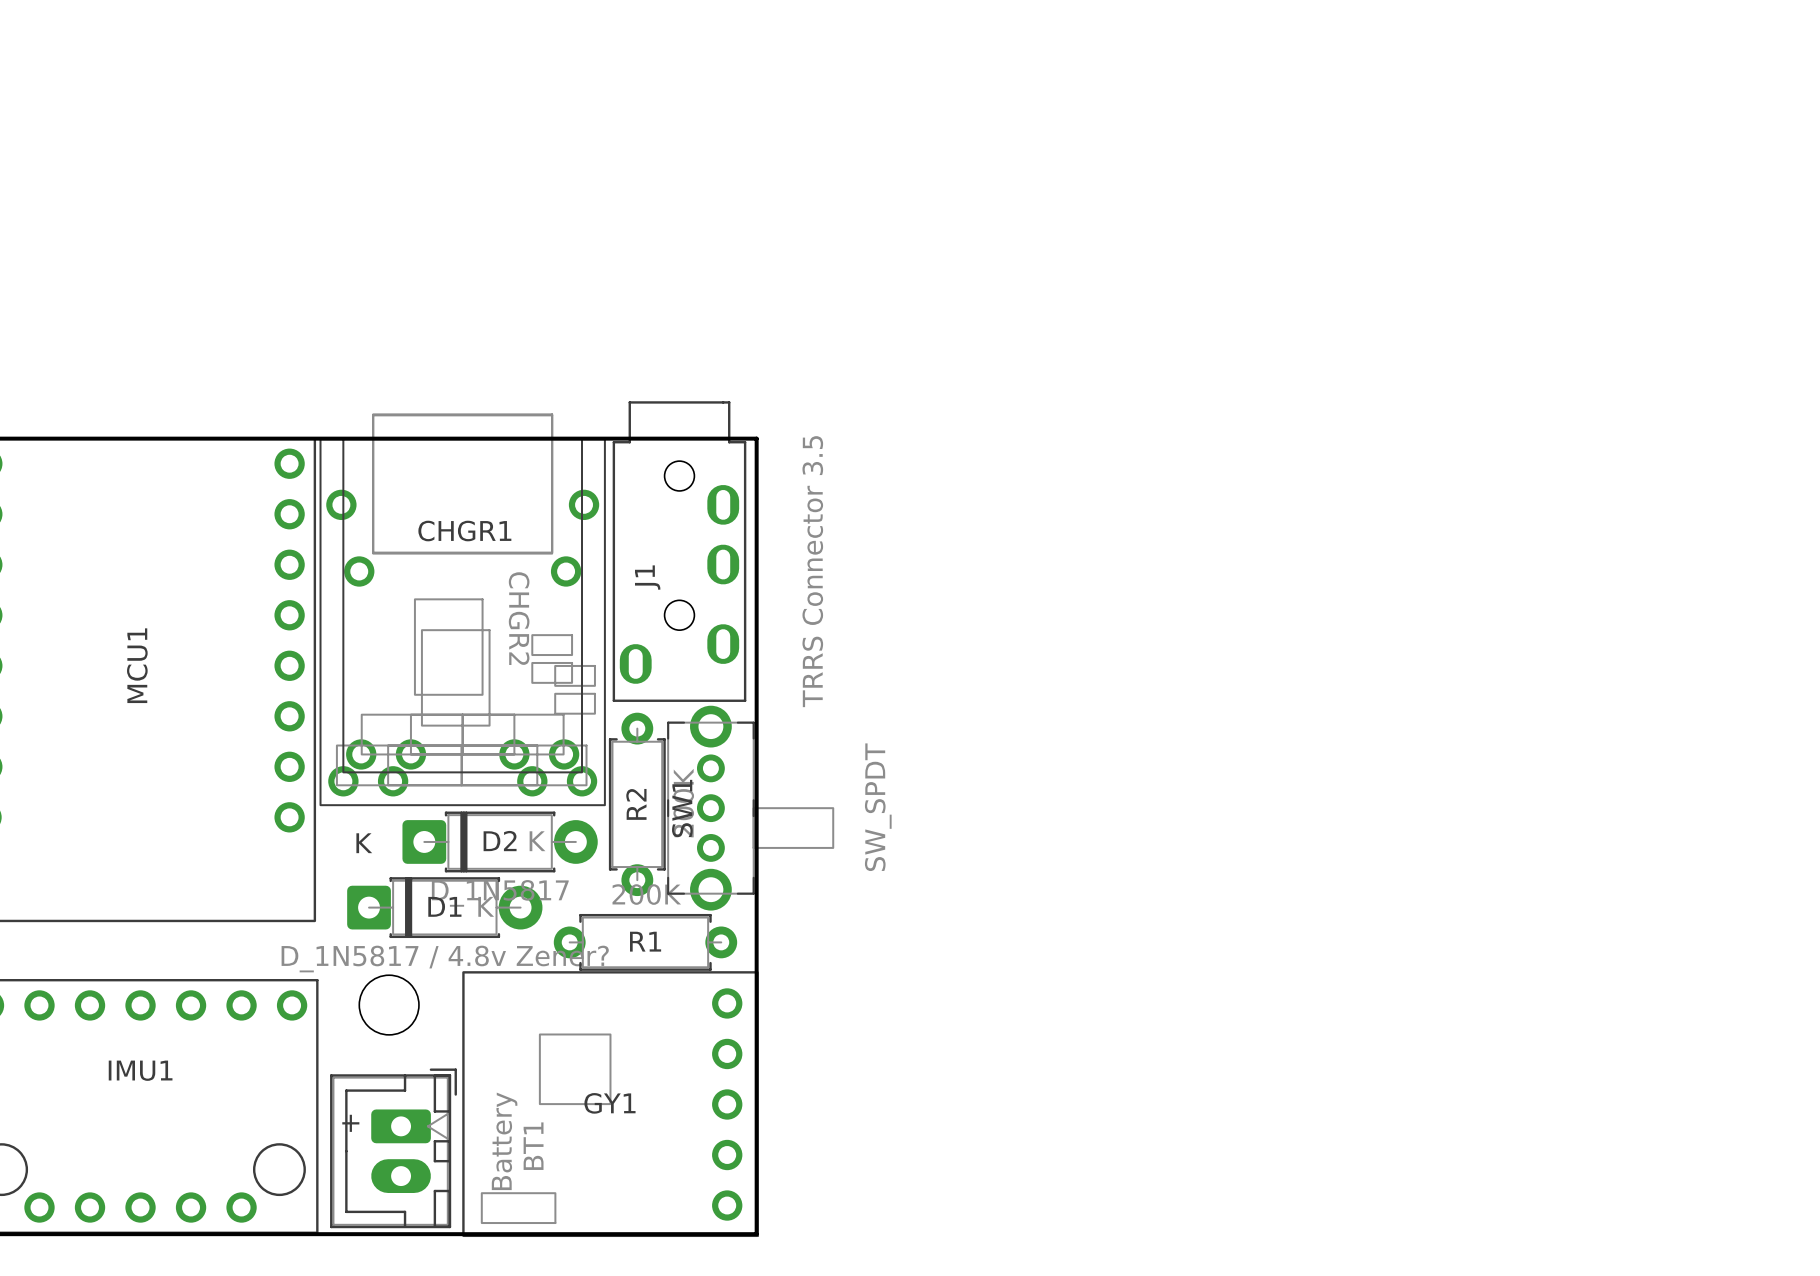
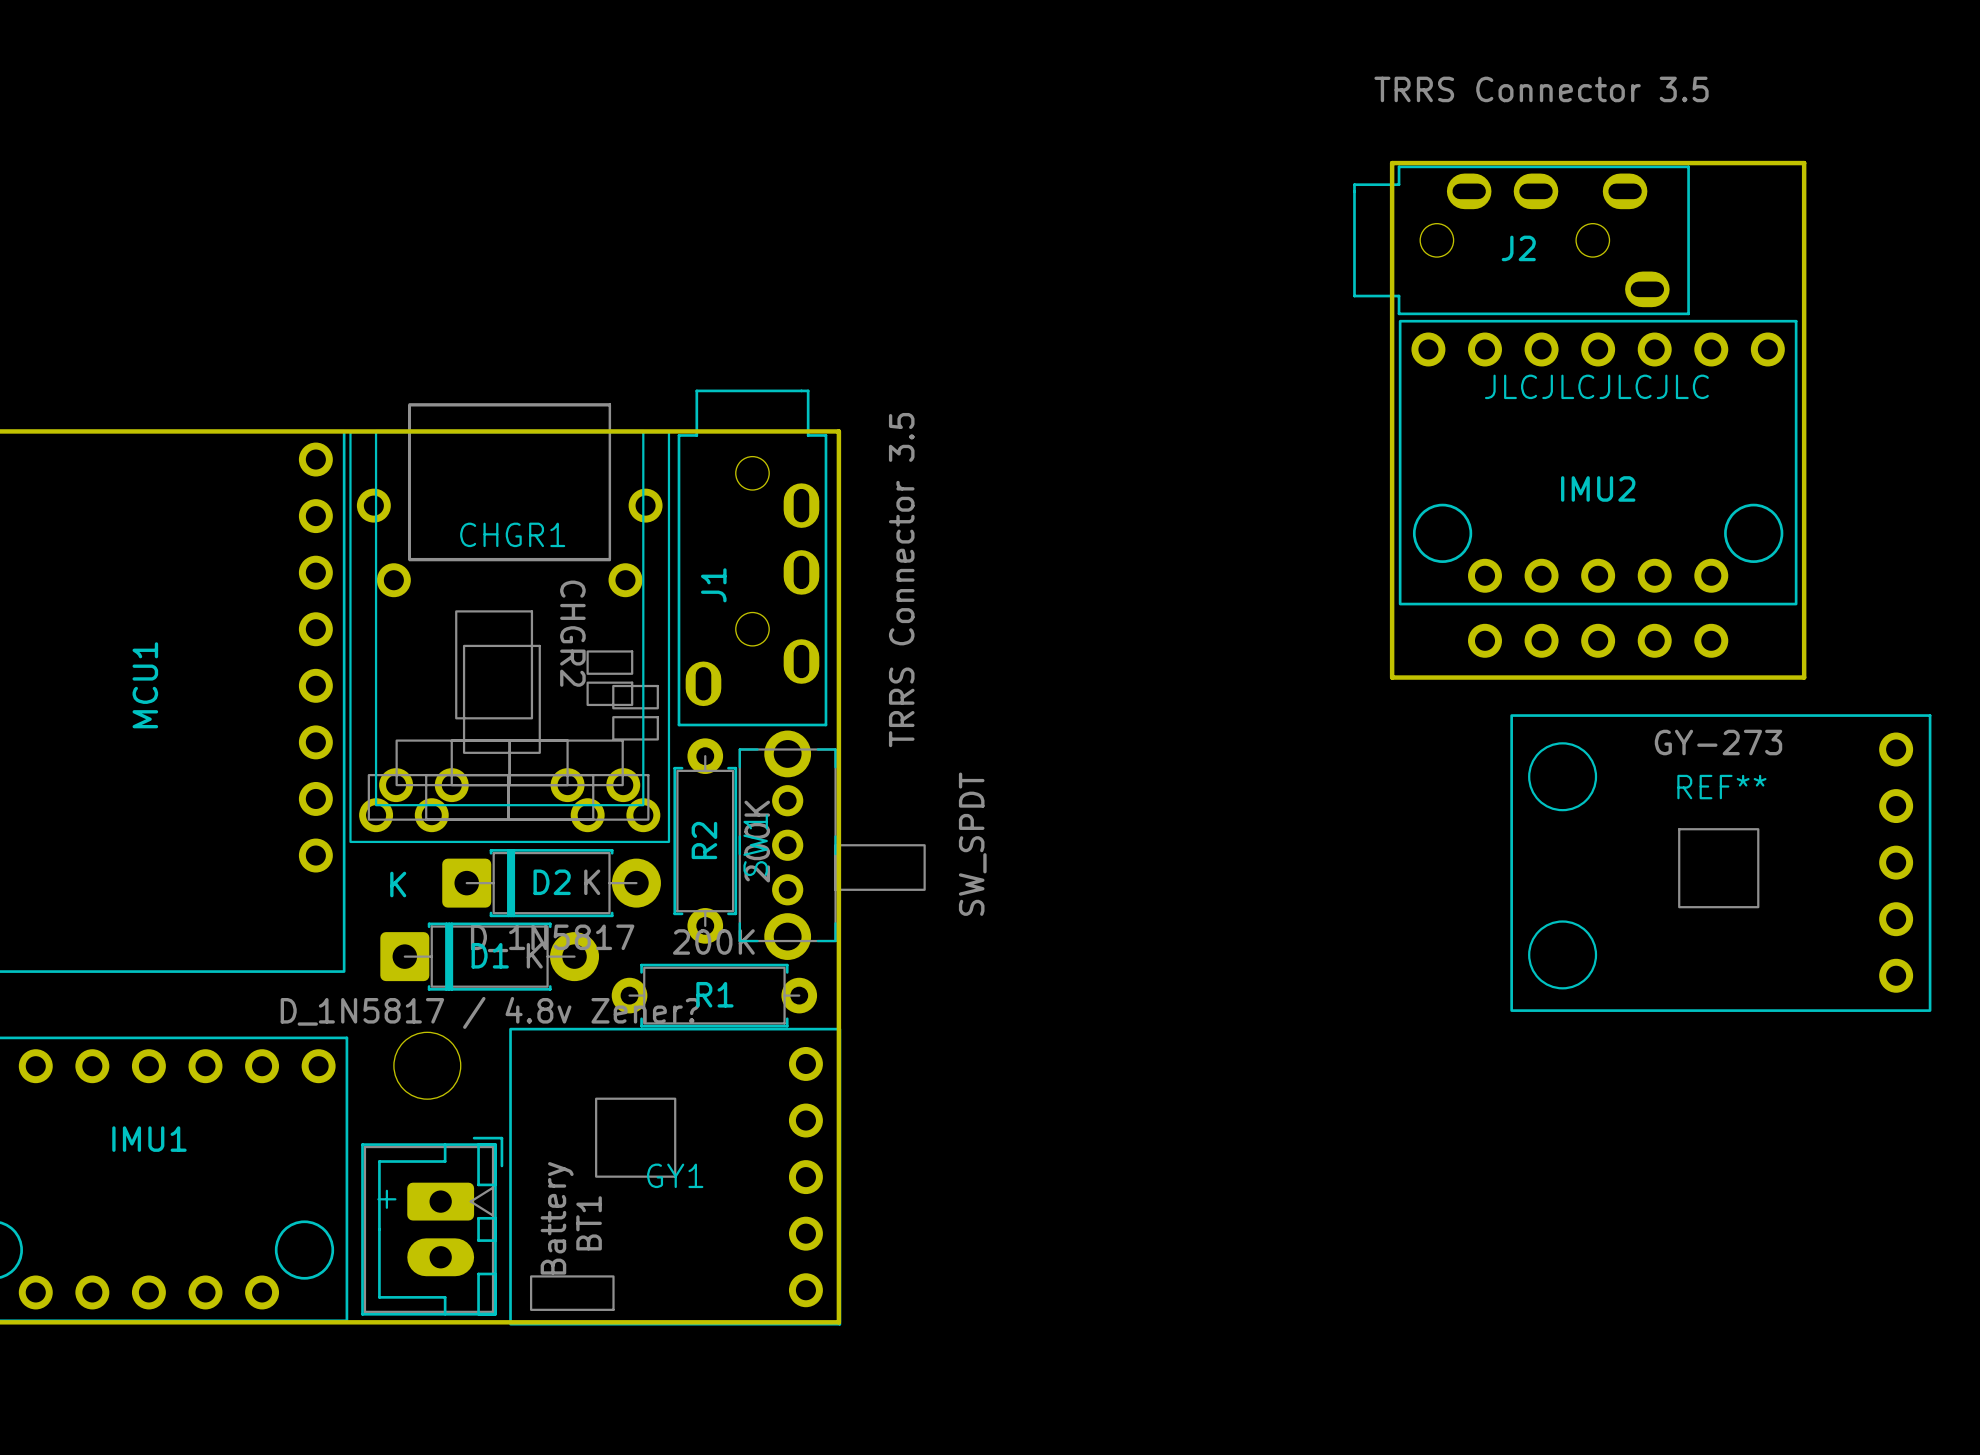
board edge: none -> (1392, 163) (1804, 163) (1804, 677) (1392, 677) (1392, 163)
J2: none -> TRRS Connector 3.5 (1521, 240)
text: none -> JLCJLCJLCJLC (1596, 386)
IMU2: none -> (1598, 462)
part: none -> (1598, 640)
REF**: none -> GY-273 (1720, 863)

